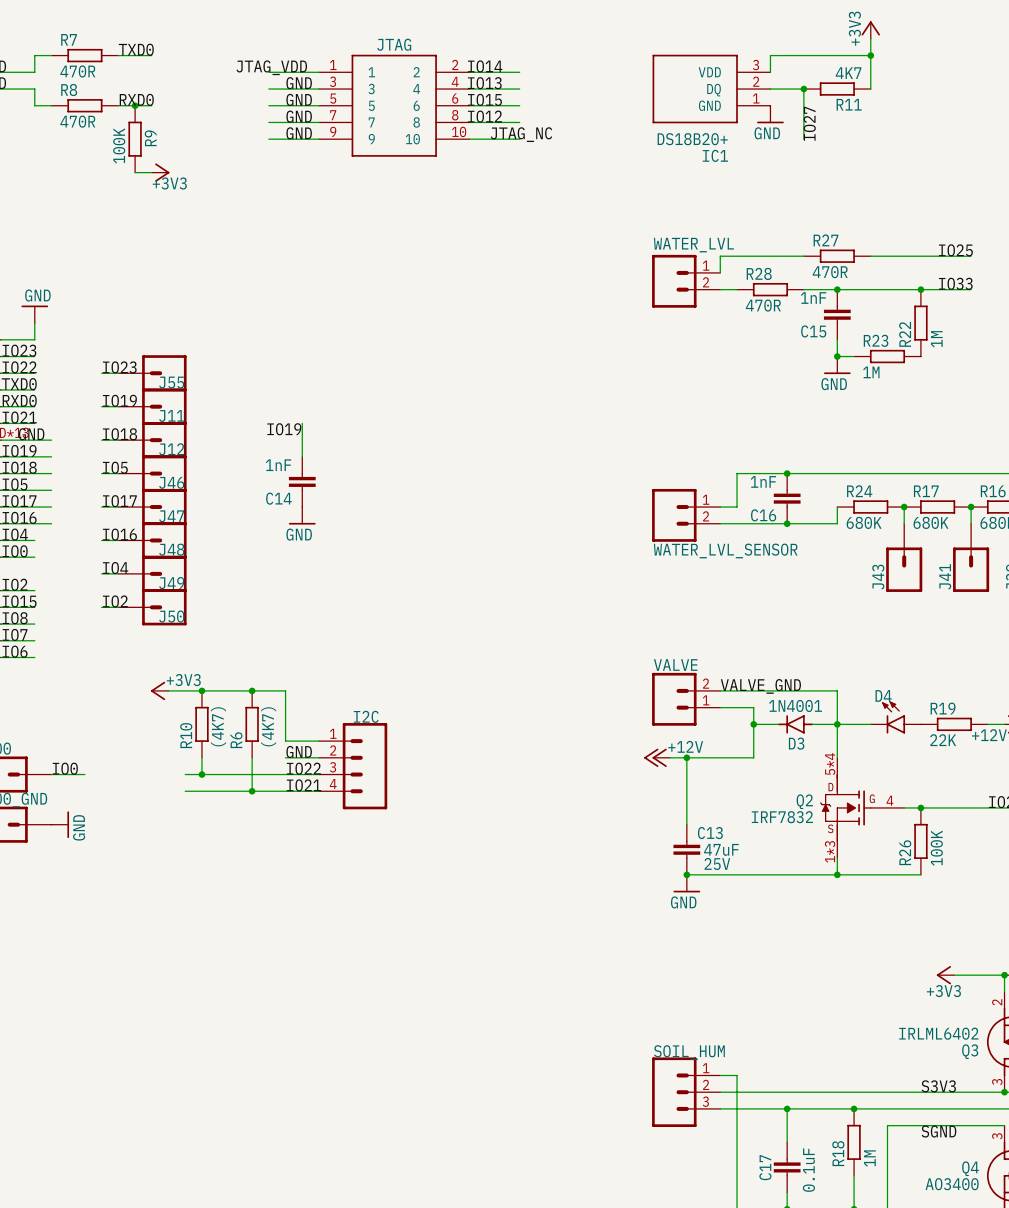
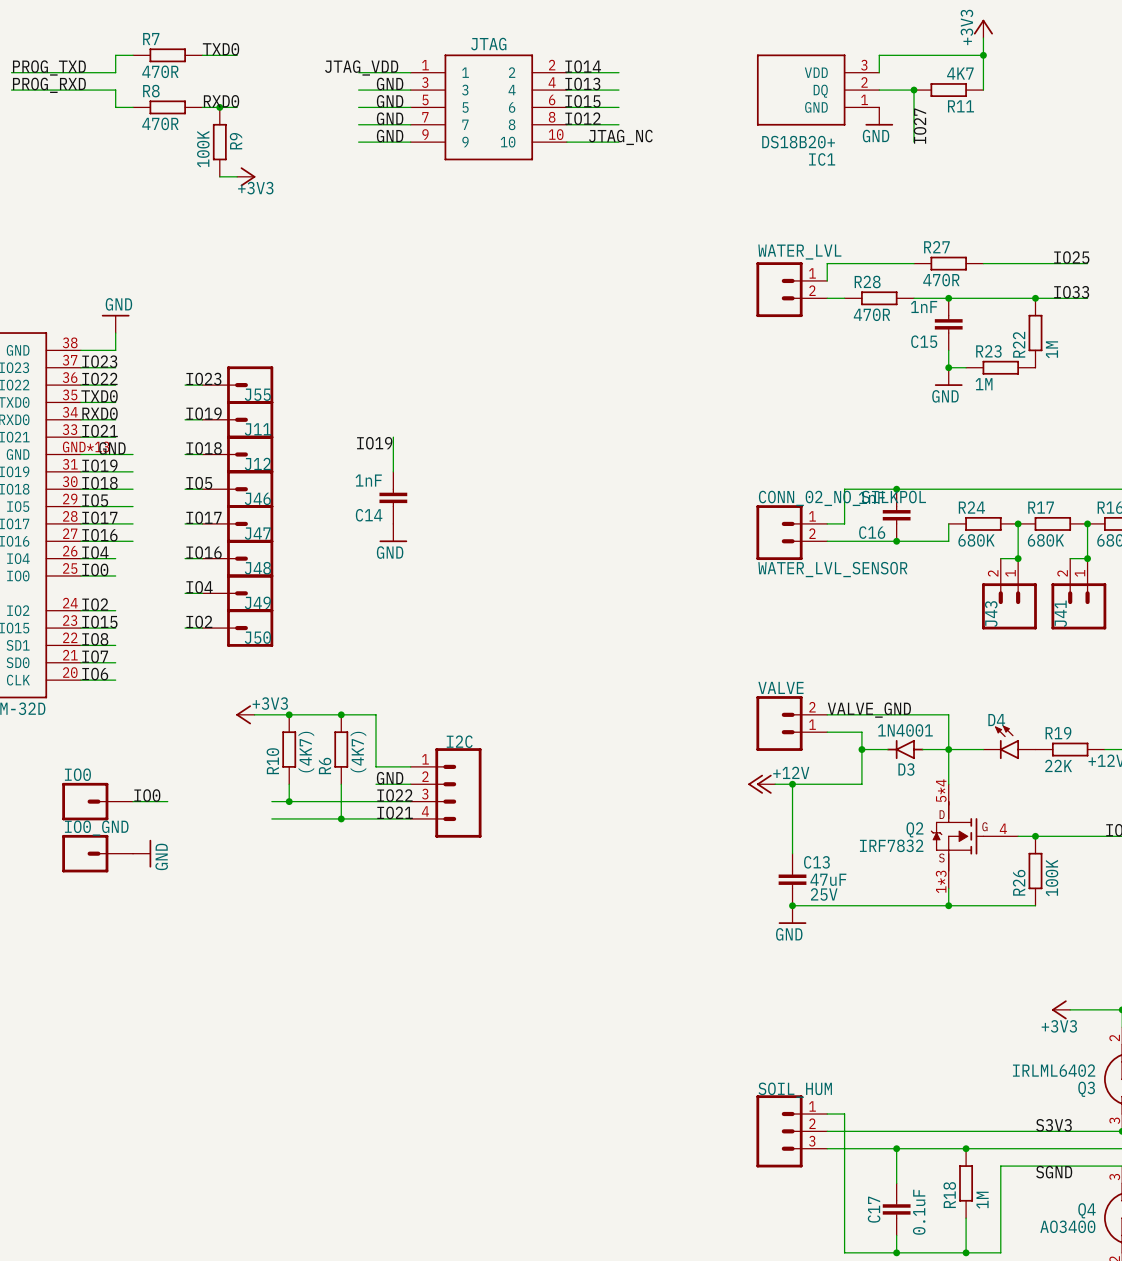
WATER_LVL_SENSOR value: none -> CONN_02_NO_SILKPOL (842, 498)
J43 symbol: [886, 523, 923, 592] -> [982, 558, 1037, 630]
wire: none -> (1018, 541) (1018, 558) (1000, 558)
J41 symbol: [953, 523, 990, 592] -> [1051, 558, 1107, 630]
wire: none -> (1087, 541) (1087, 558) (1070, 558)
junction: none -> (1018, 558)
junction: none -> (1087, 558)

